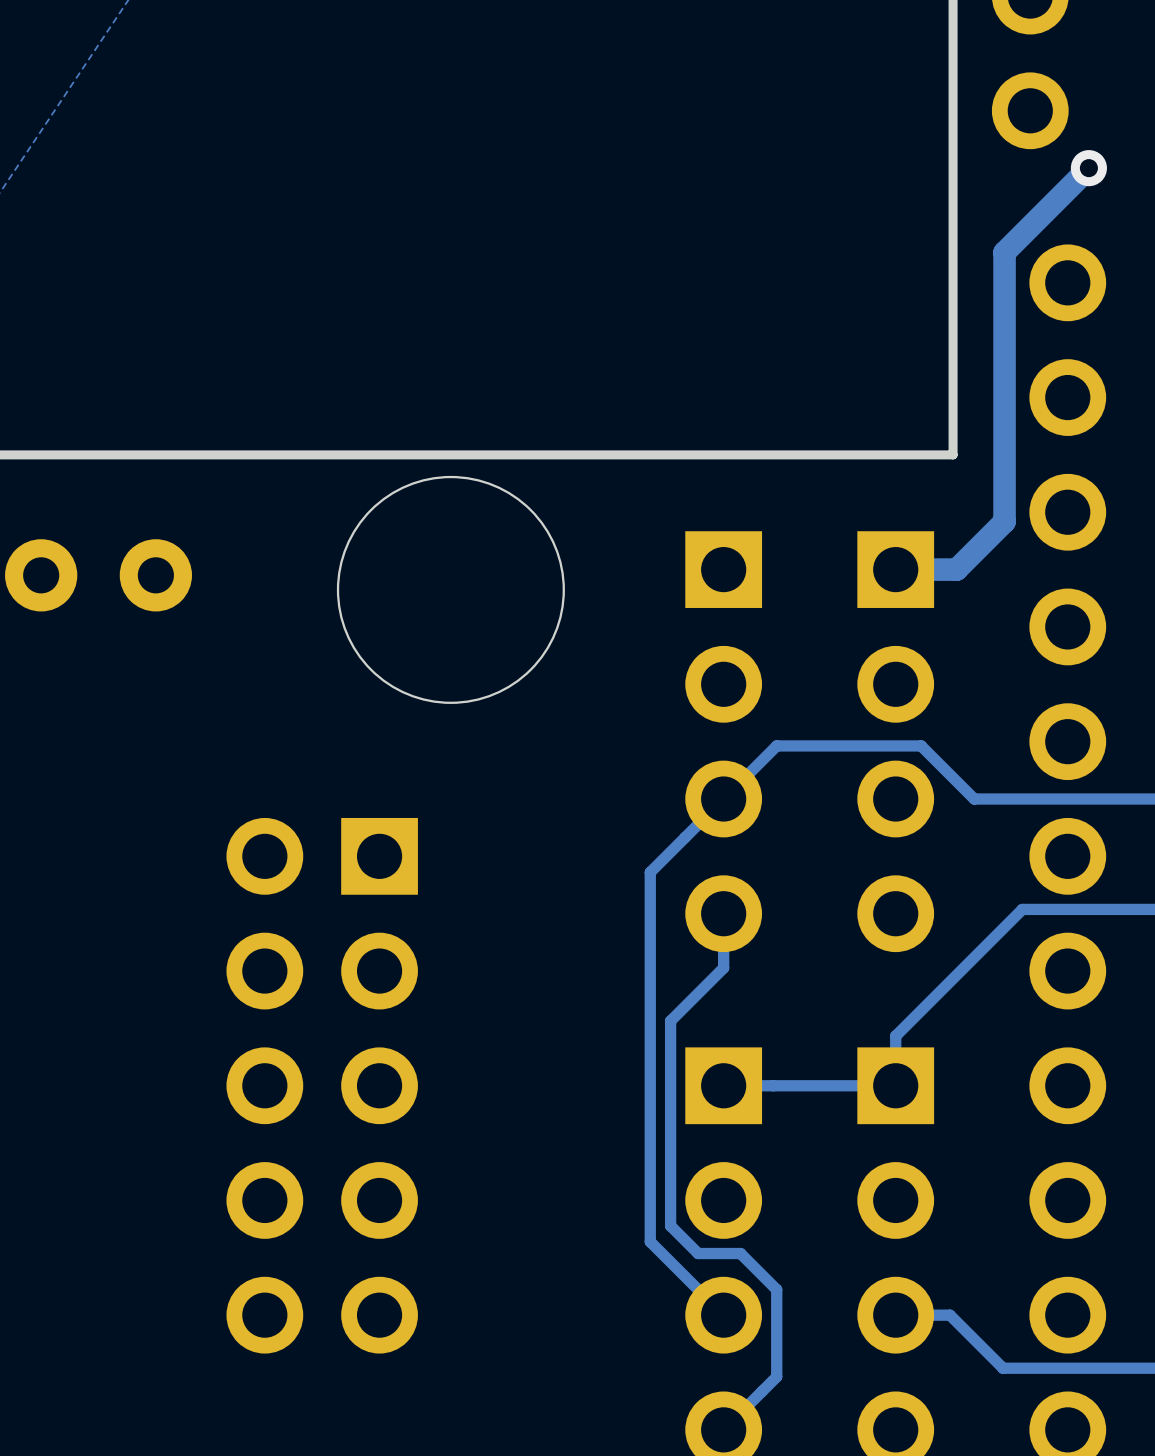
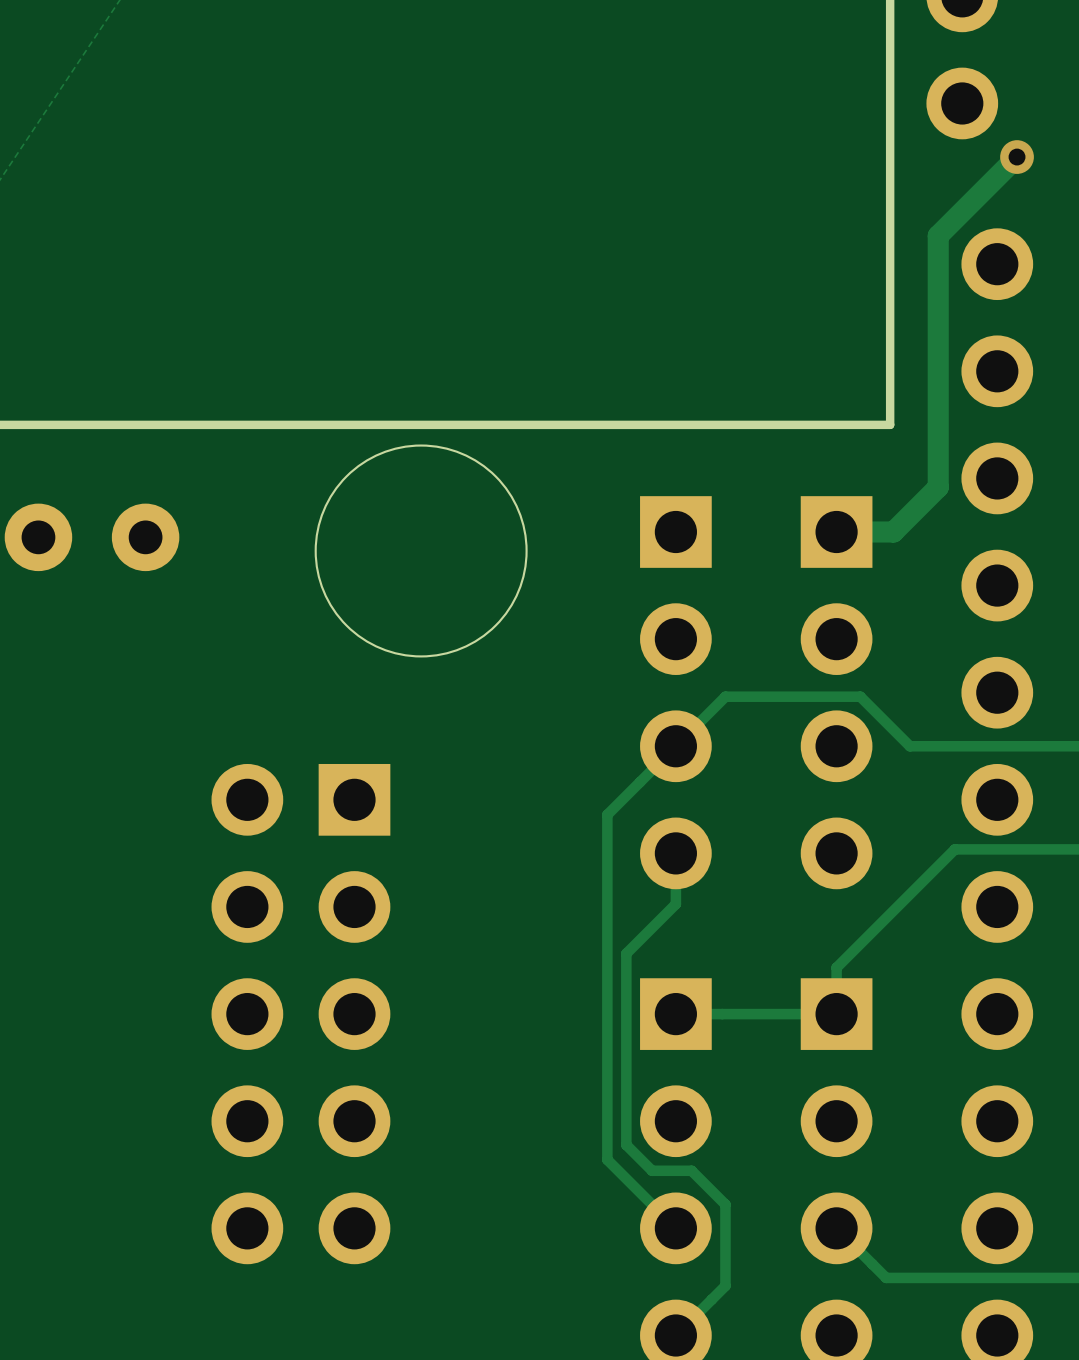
track: (895, 1315) (950, 1315) (1003, 1368) -> (836, 1228) (886, 1277) (936, 1277)

